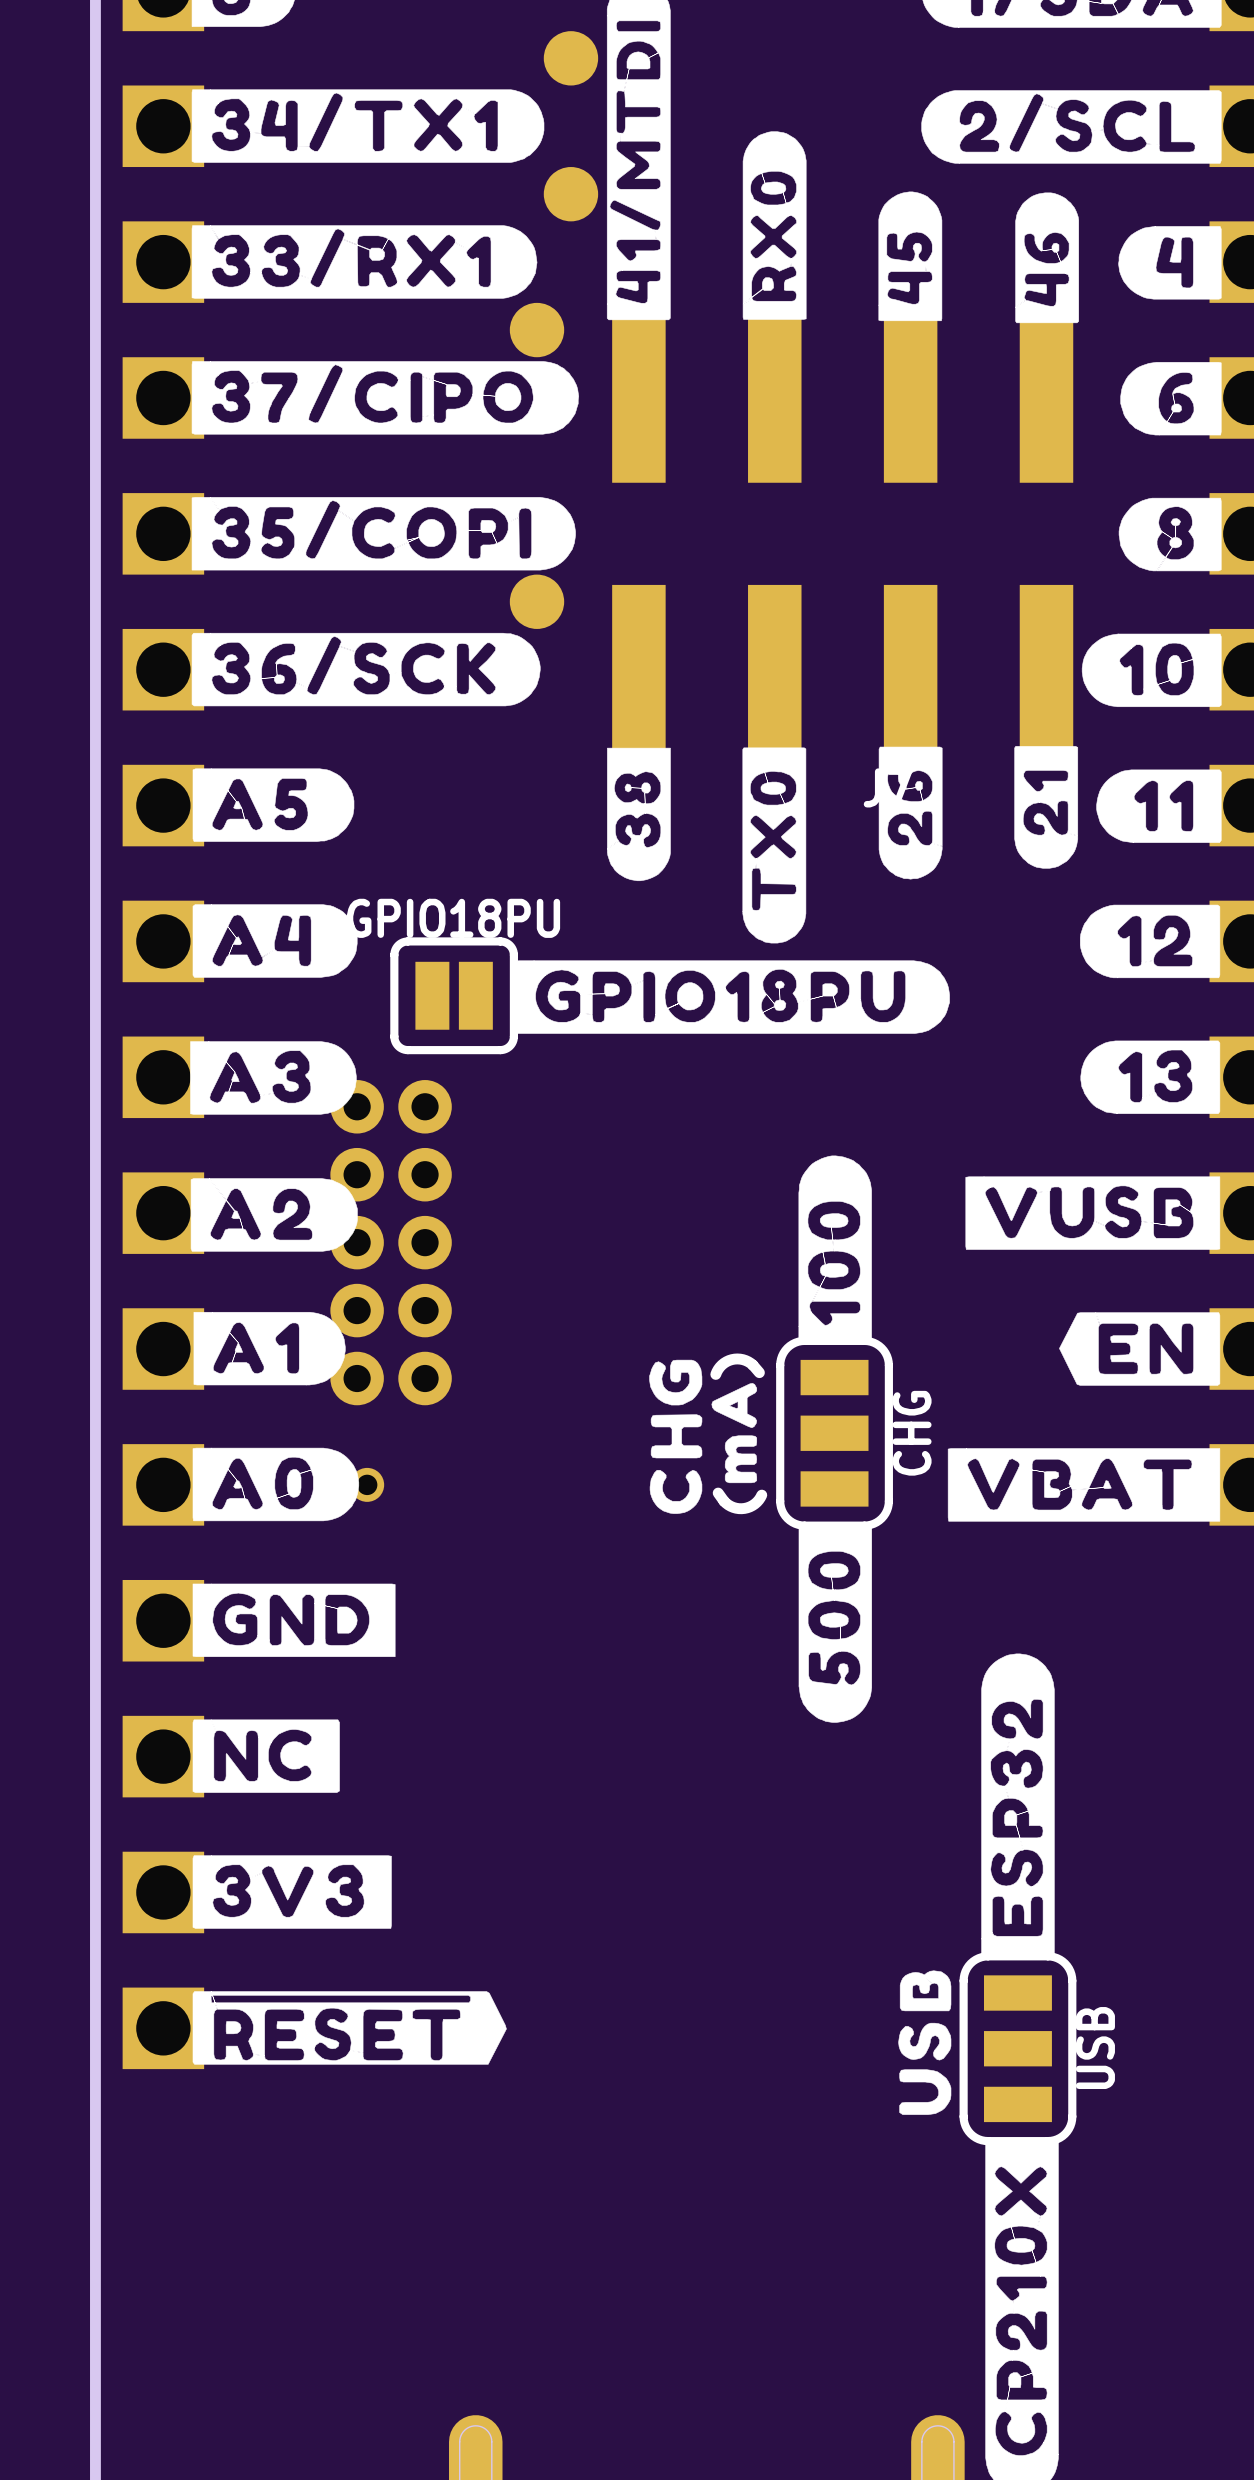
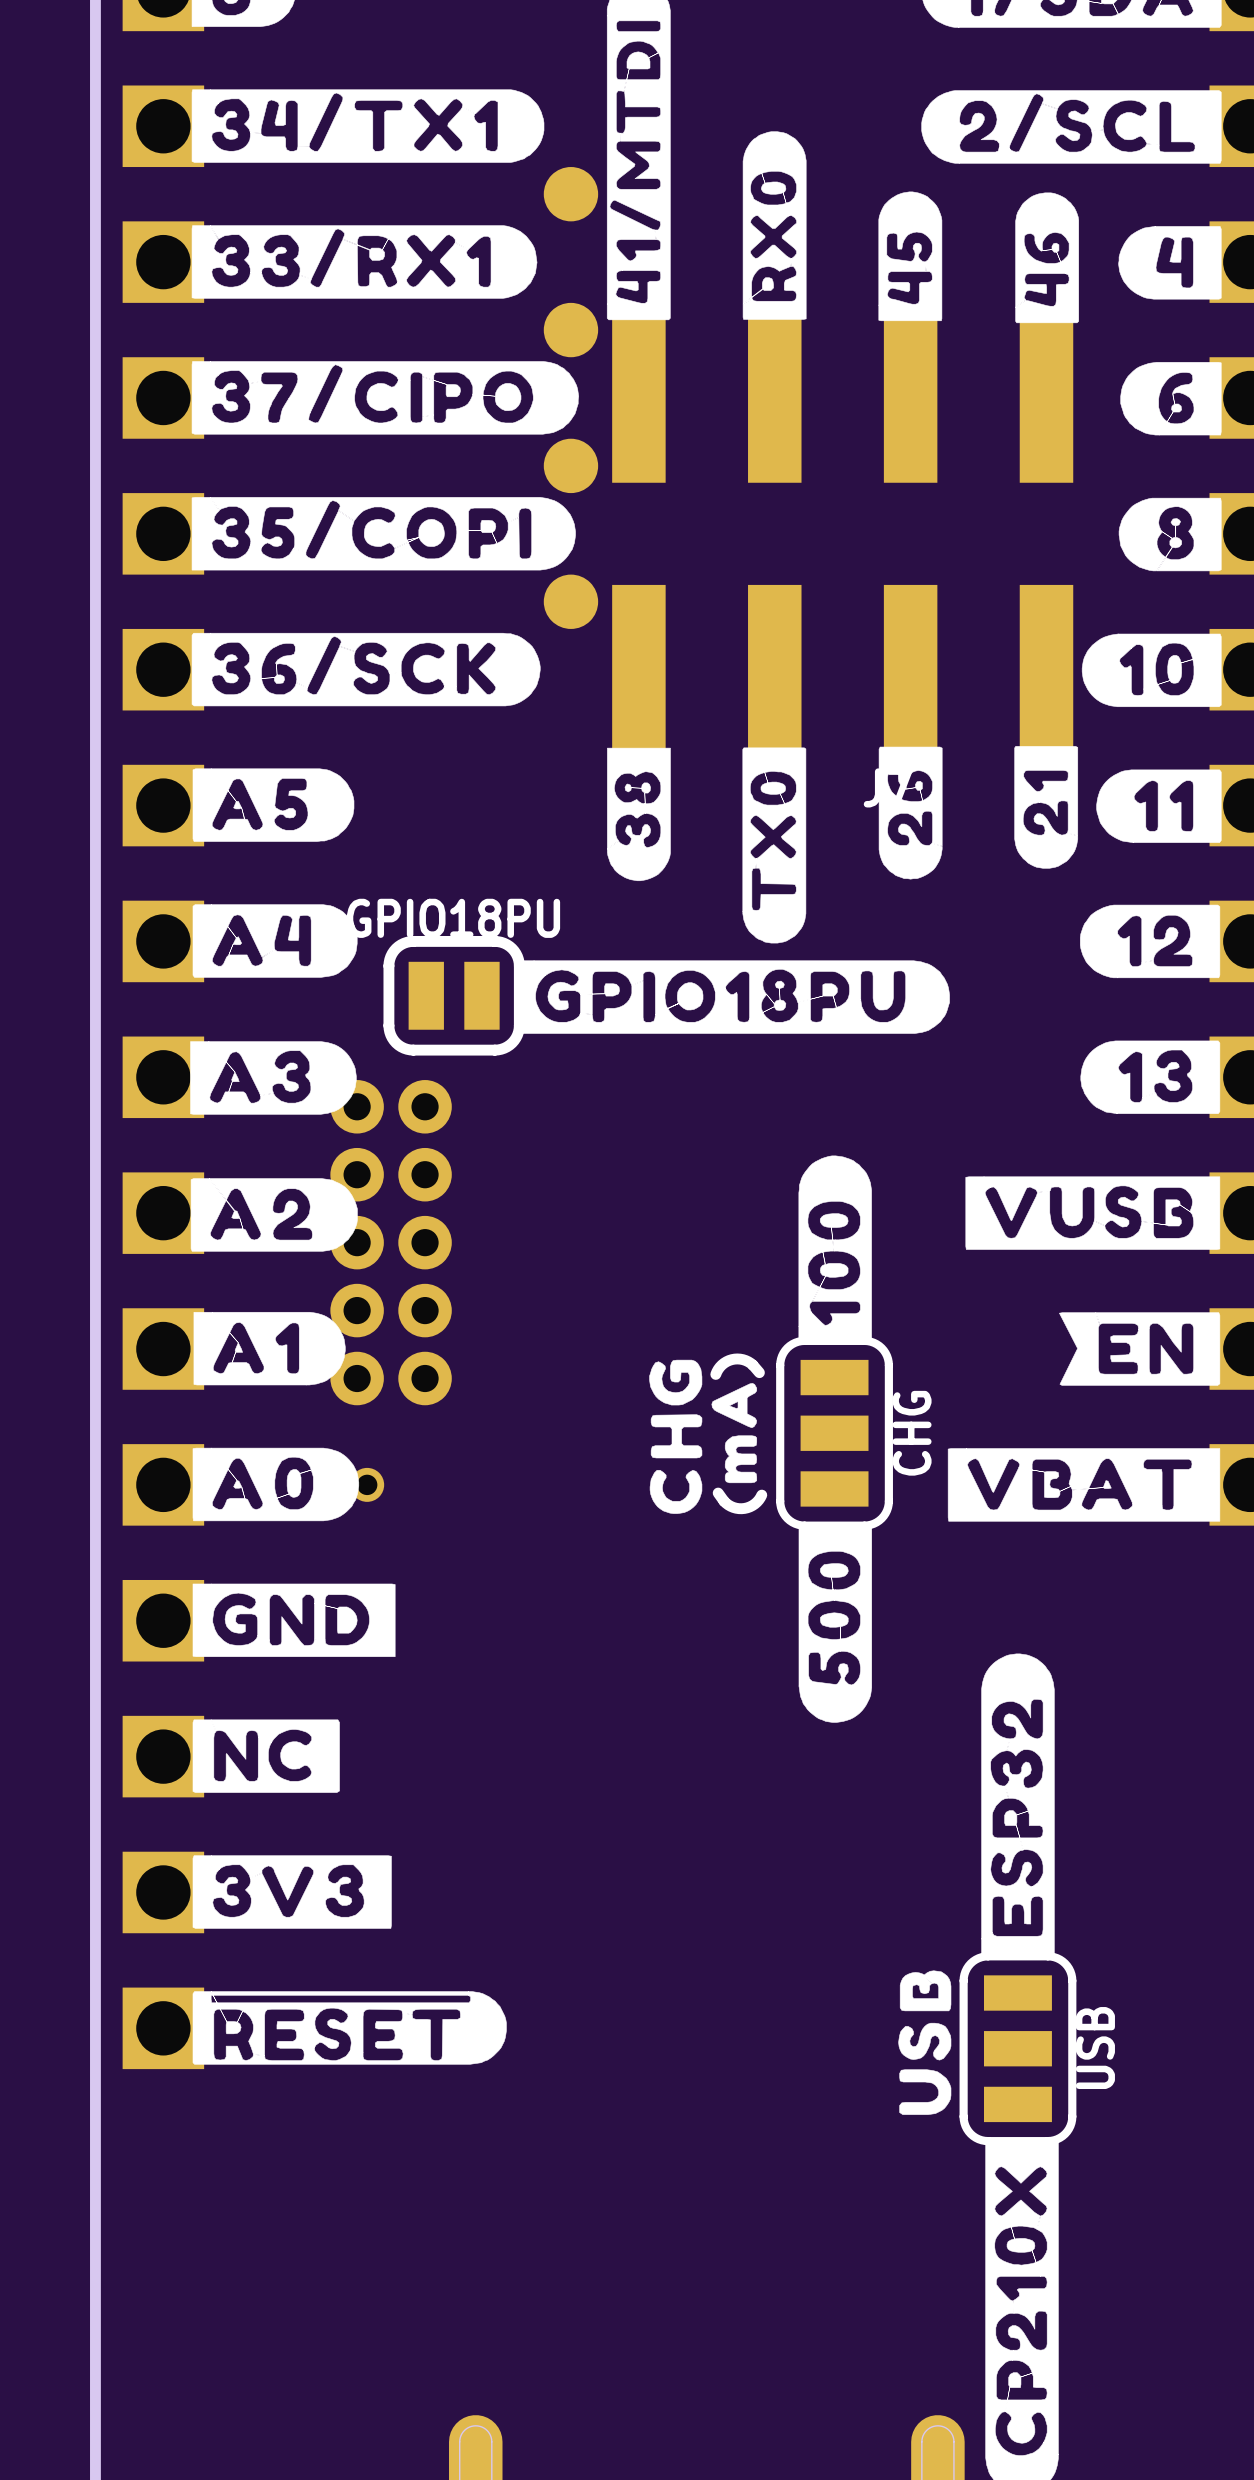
part position: (570, 58) -> (570, 465)
part position: (537, 330) -> (570, 330)
part position: (537, 601) -> (570, 601)
GPIO18PU footprint: [390, 937, 518, 1055] -> [383, 936, 525, 1056]
drawing shape: [1059, 1312, 1221, 1386] -> [1059, 1312, 1221, 1386]
drawing shape: [192, 1991, 507, 2065] -> [192, 1991, 507, 2065]

